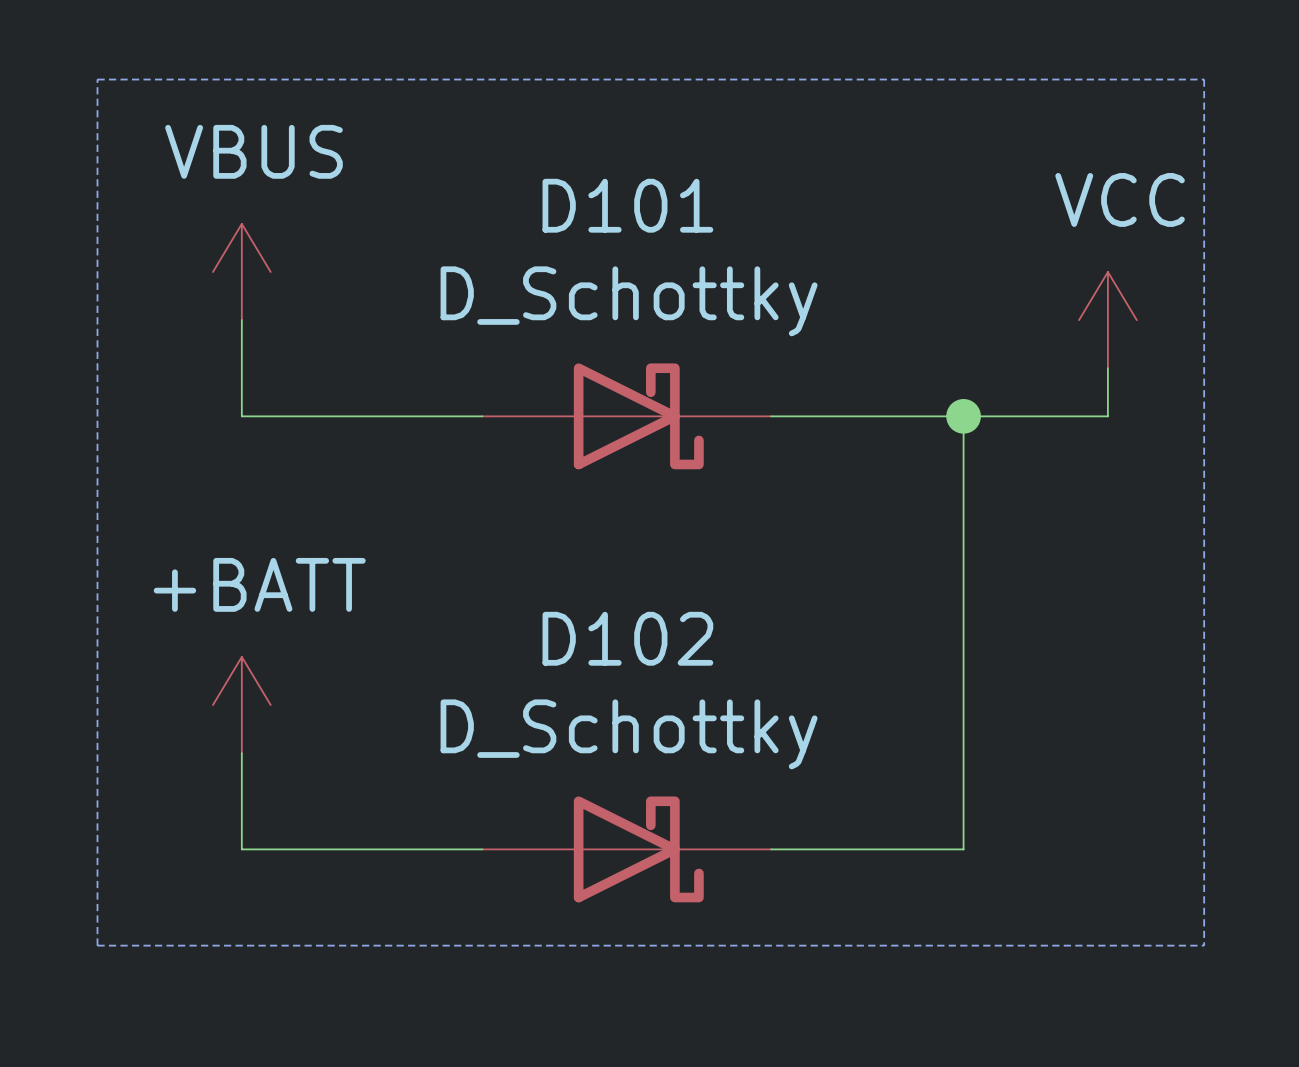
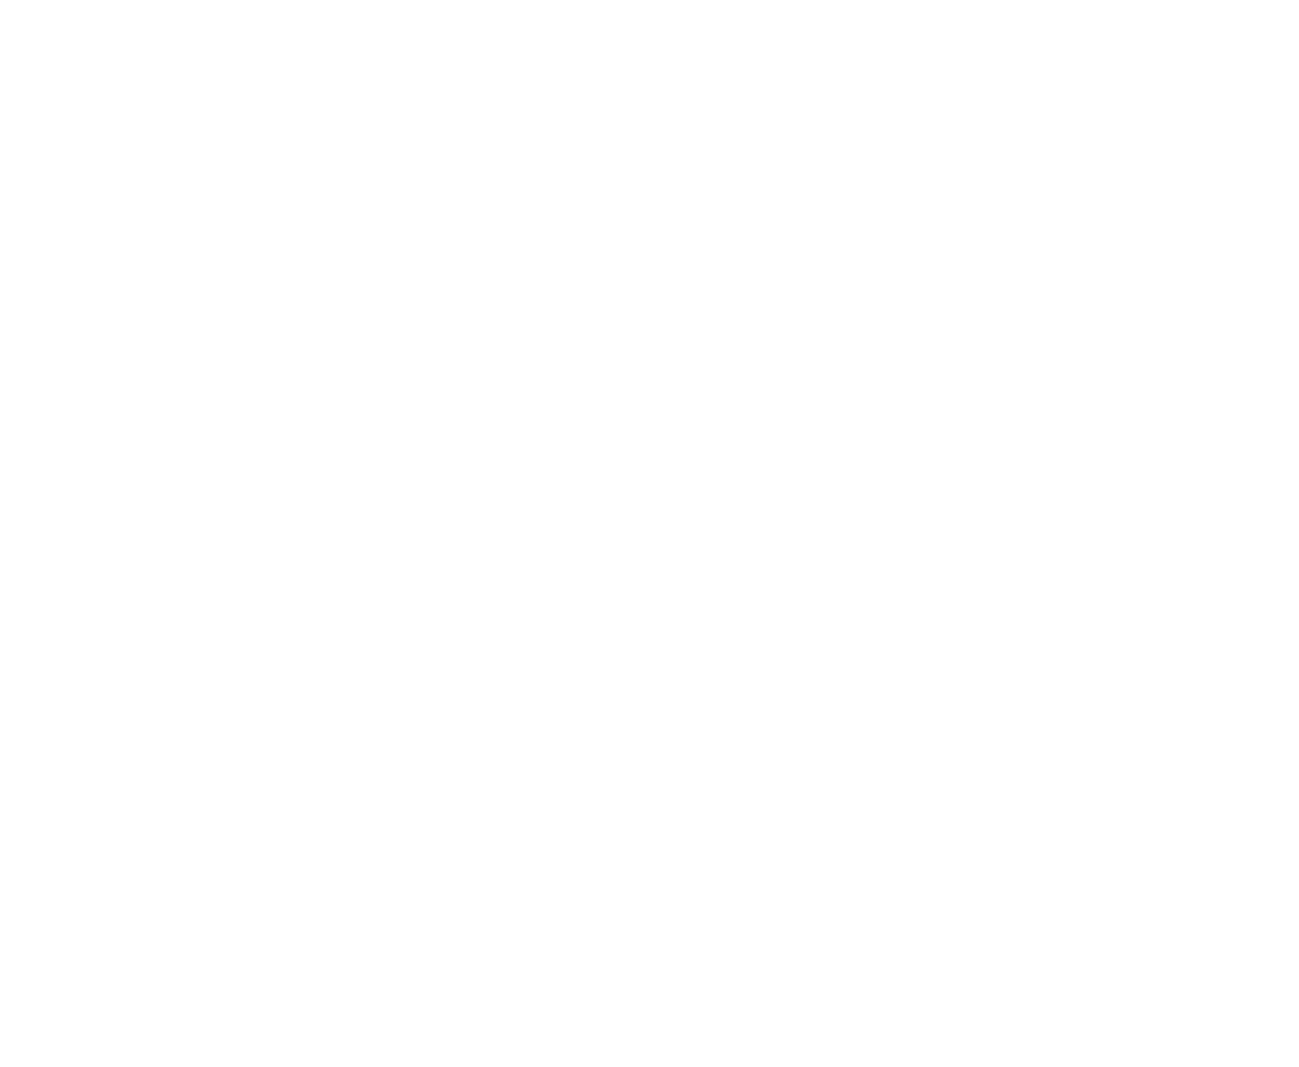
line: (97, 79) (97, 945) (1204, 945) (1204, 79) (97, 79) -> none
power symbol: VBUS (241, 272) -> none
wire: (241, 320) (241, 416) (482, 416) -> none
power symbol: VCC (1107, 320) -> none
wire: (1107, 368) (1107, 416) (771, 416) -> none
D101: D_Schottky (626, 416) -> none
wire: (963, 416) (963, 849) (771, 849) -> none
junction: (963, 416) -> none
power symbol: +BATT (241, 705) -> none
wire: (241, 753) (241, 849) (482, 849) -> none
D102: D_Schottky (626, 849) -> none

